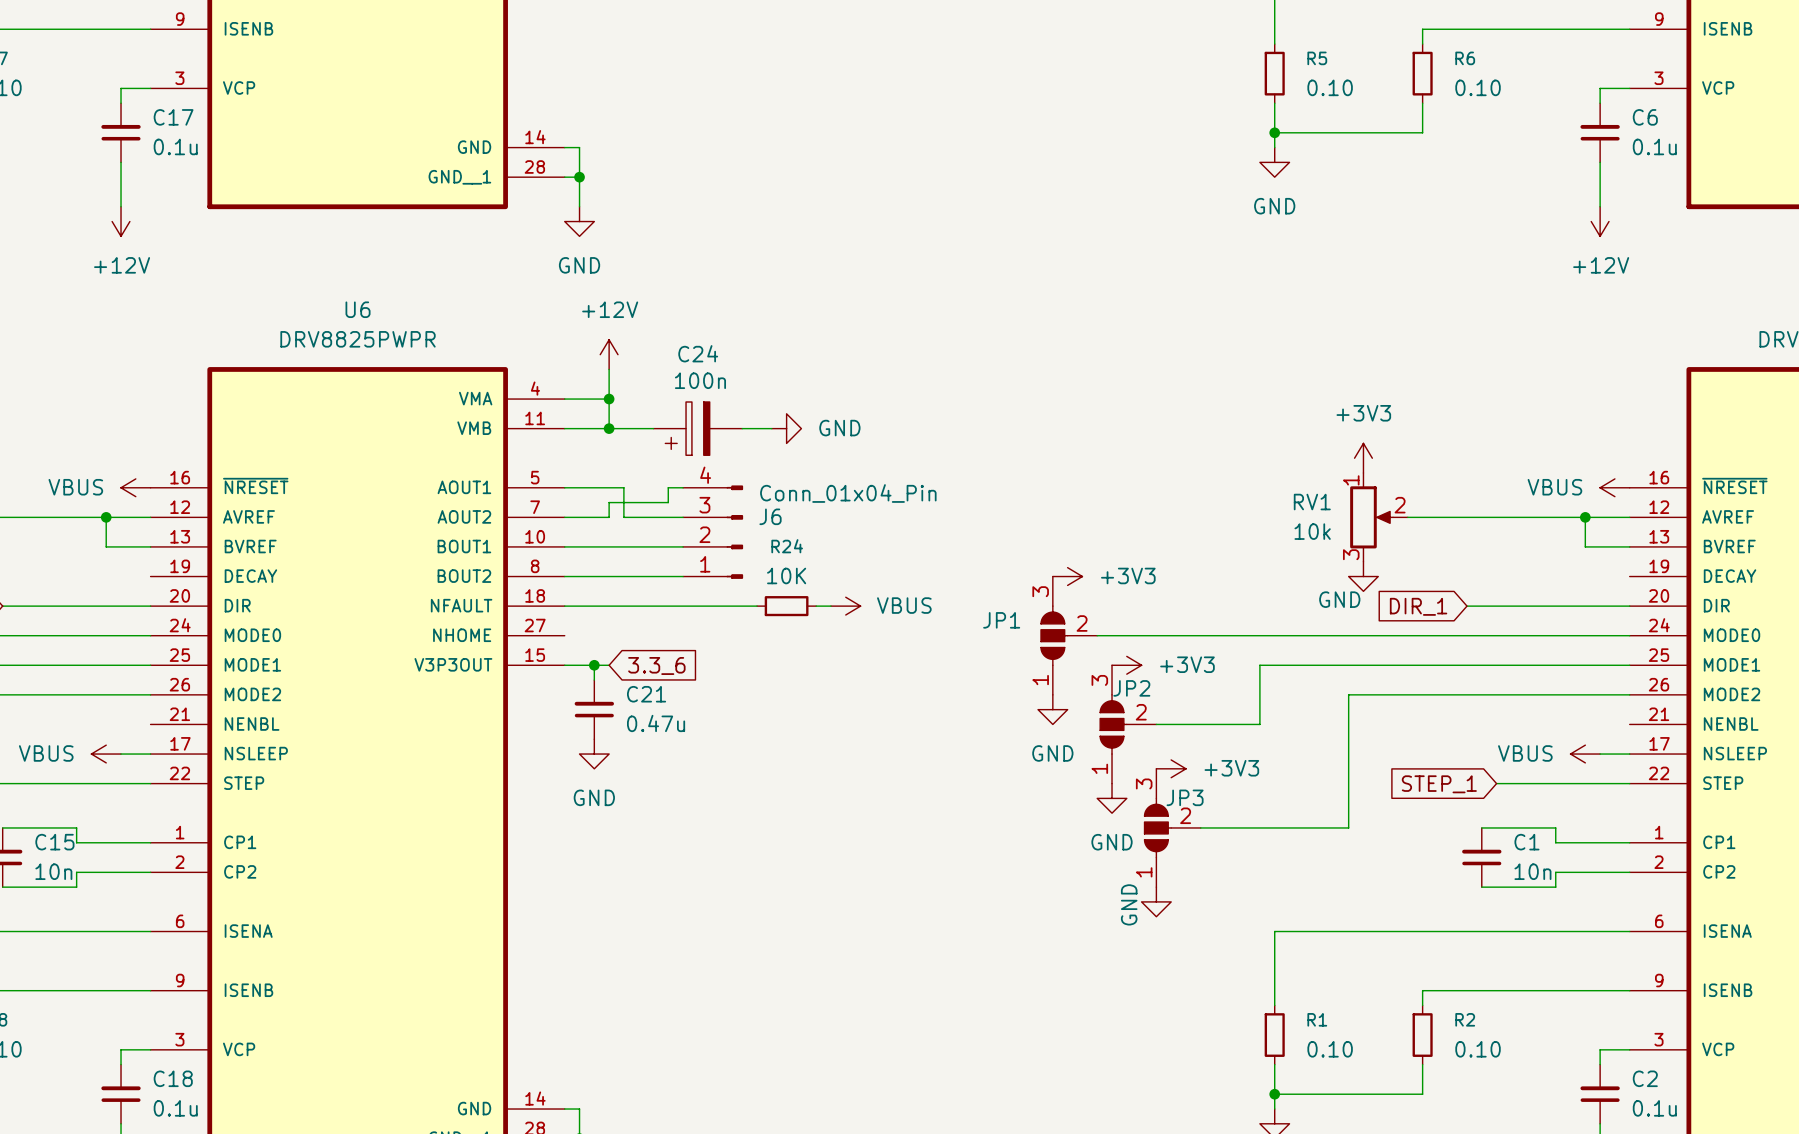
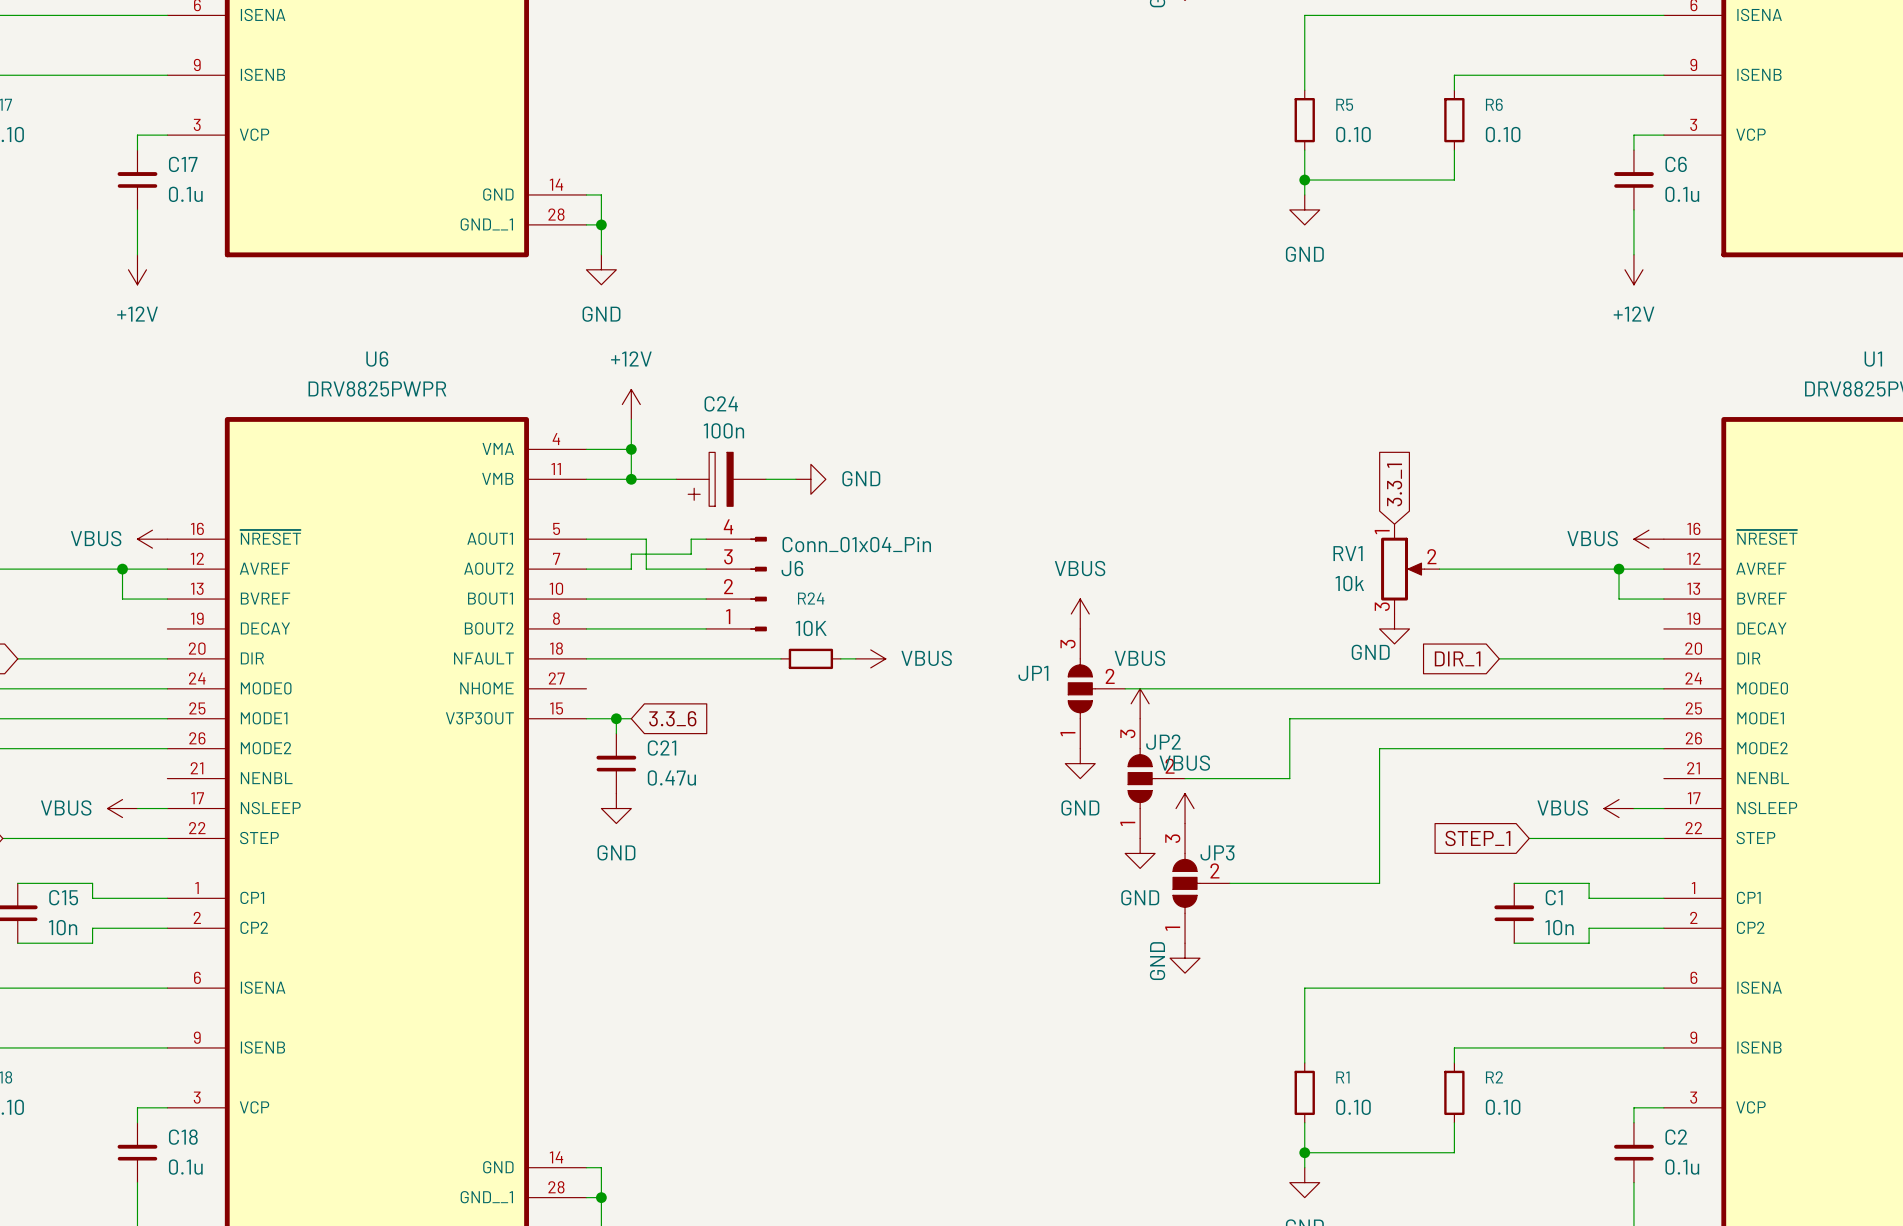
global label: none -> 3.3_1 (1394, 484)
power symbol: +3V3 (1363, 458) -> none
power symbol: none -> VBUS (1080, 613)
power symbol: +3V3 (1067, 576) -> none
power symbol: none -> VBUS (1140, 703)
power symbol: +3V3 (1126, 665) -> none
power symbol: none -> VBUS (1185, 808)
power symbol: +3V3 (1171, 768) -> none

